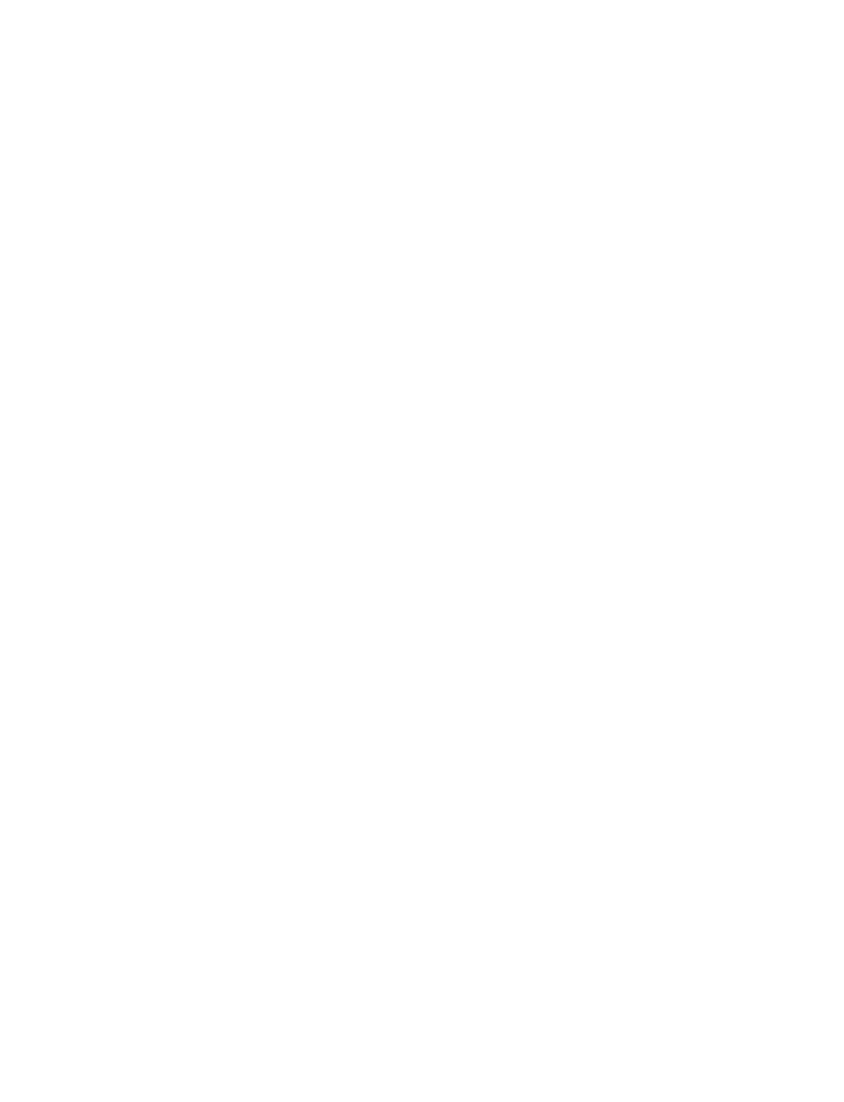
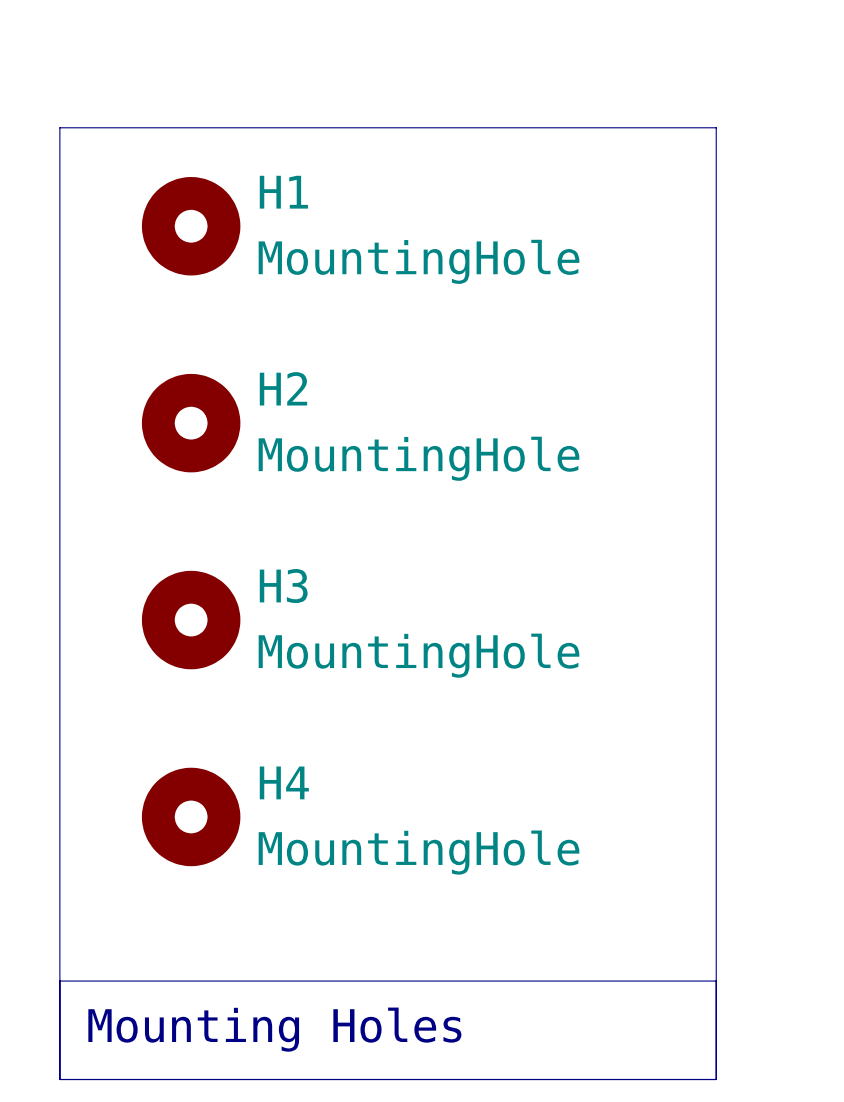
line: none -> (59, 127) (716, 127) (716, 1079) (59, 1079) (59, 127)
H1: none -> MountingHole (191, 226)
H2: none -> MountingHole (191, 423)
H3: none -> MountingHole (191, 620)
H4: none -> MountingHole (191, 816)
line: none -> (59, 981) (716, 981)
text: none -> Mounting Holes (274, 1029)

